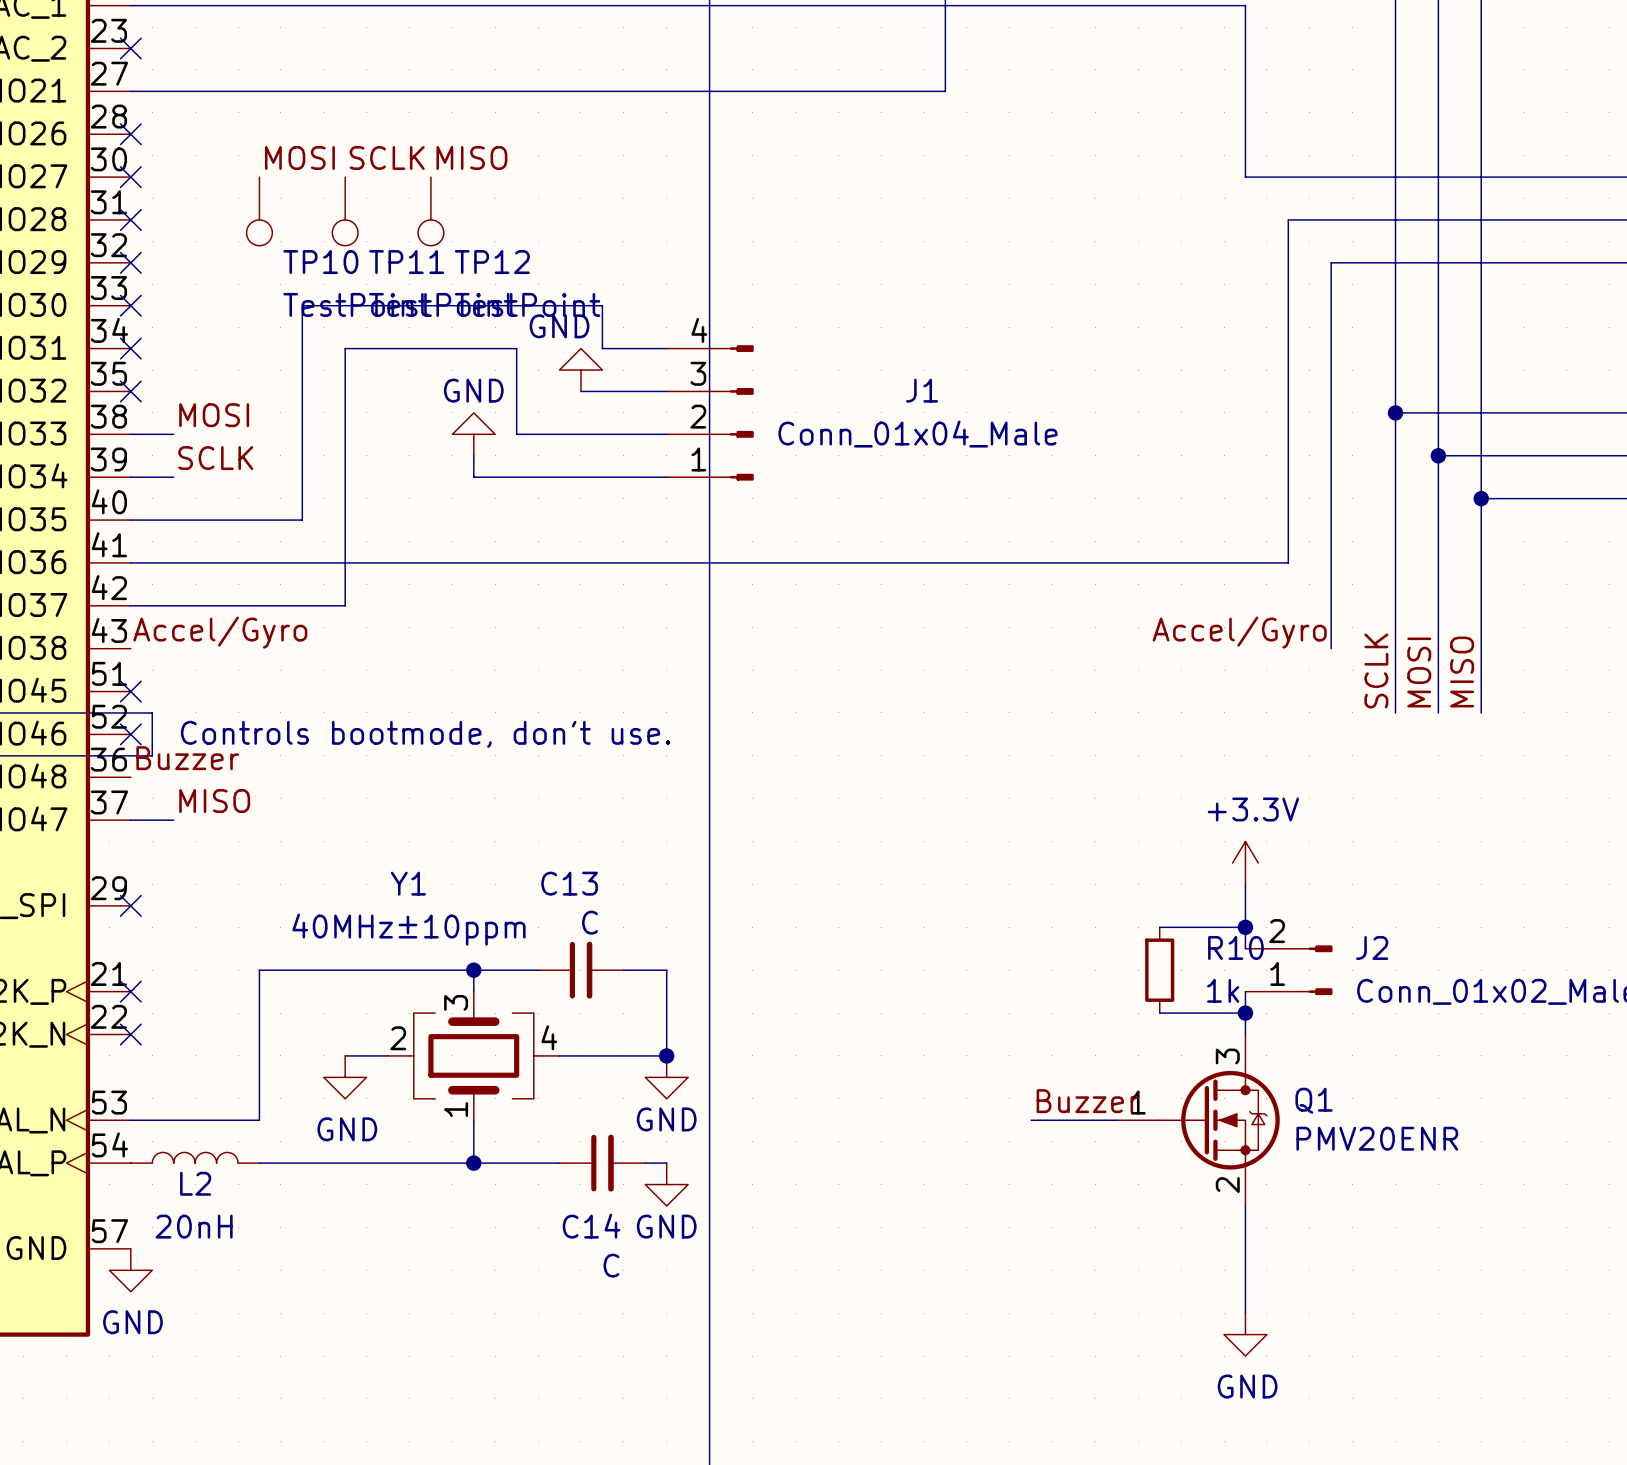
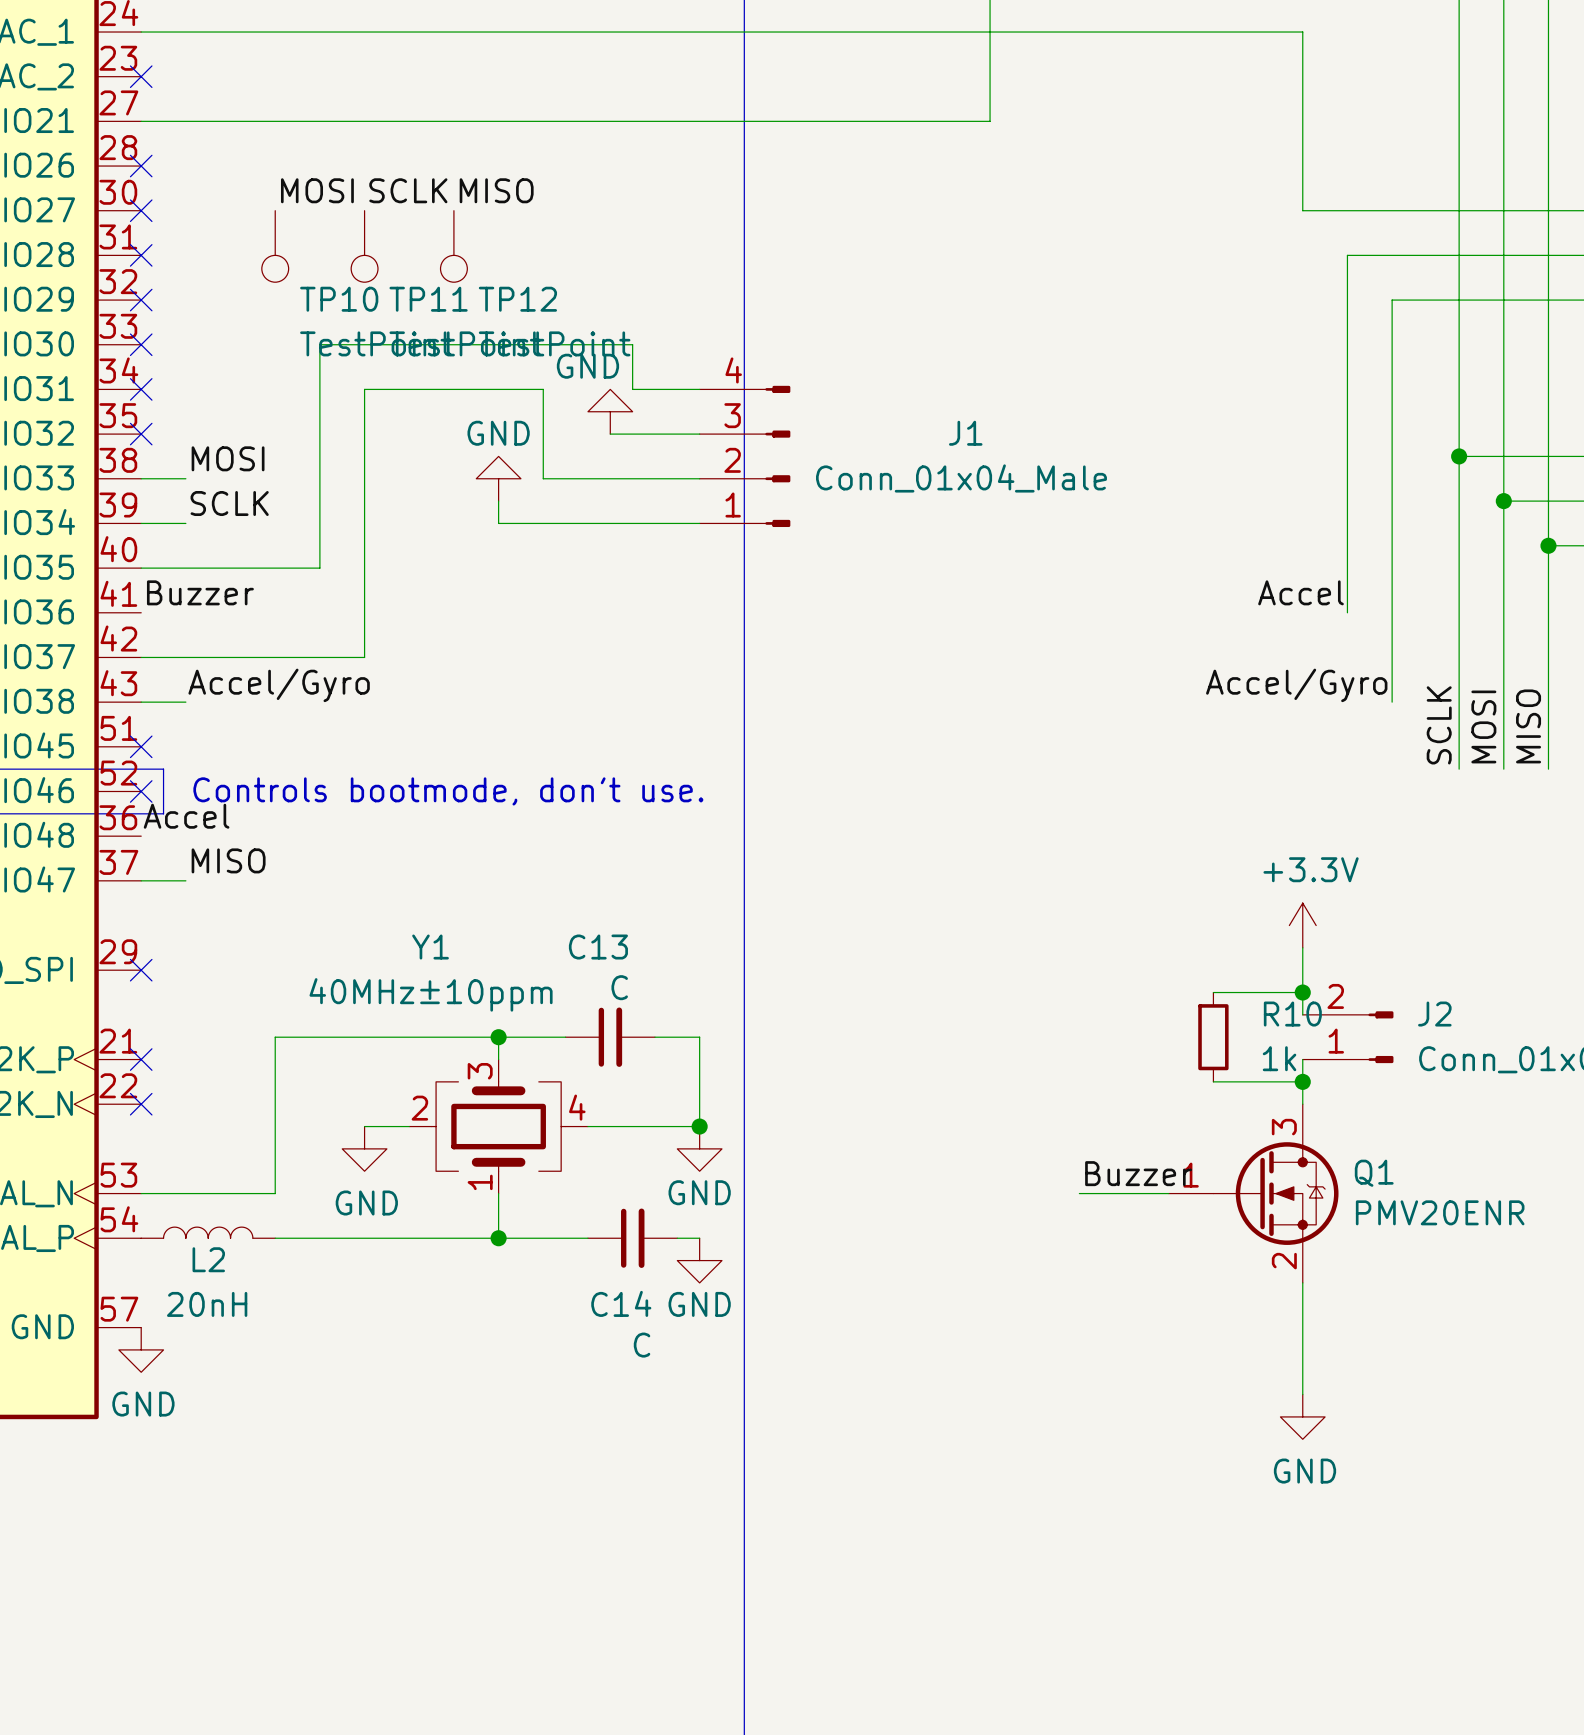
label: none -> Buzzer (200, 592)
label: none -> Accel (1301, 592)
wire: (130, 562) (1288, 562) -> none
label position: Accel/Gyro (220, 632) -> Accel/Gyro (279, 685)
wire: none -> (141, 702) (185, 702)
label: Buzzer (187, 758) -> Accel (186, 816)

